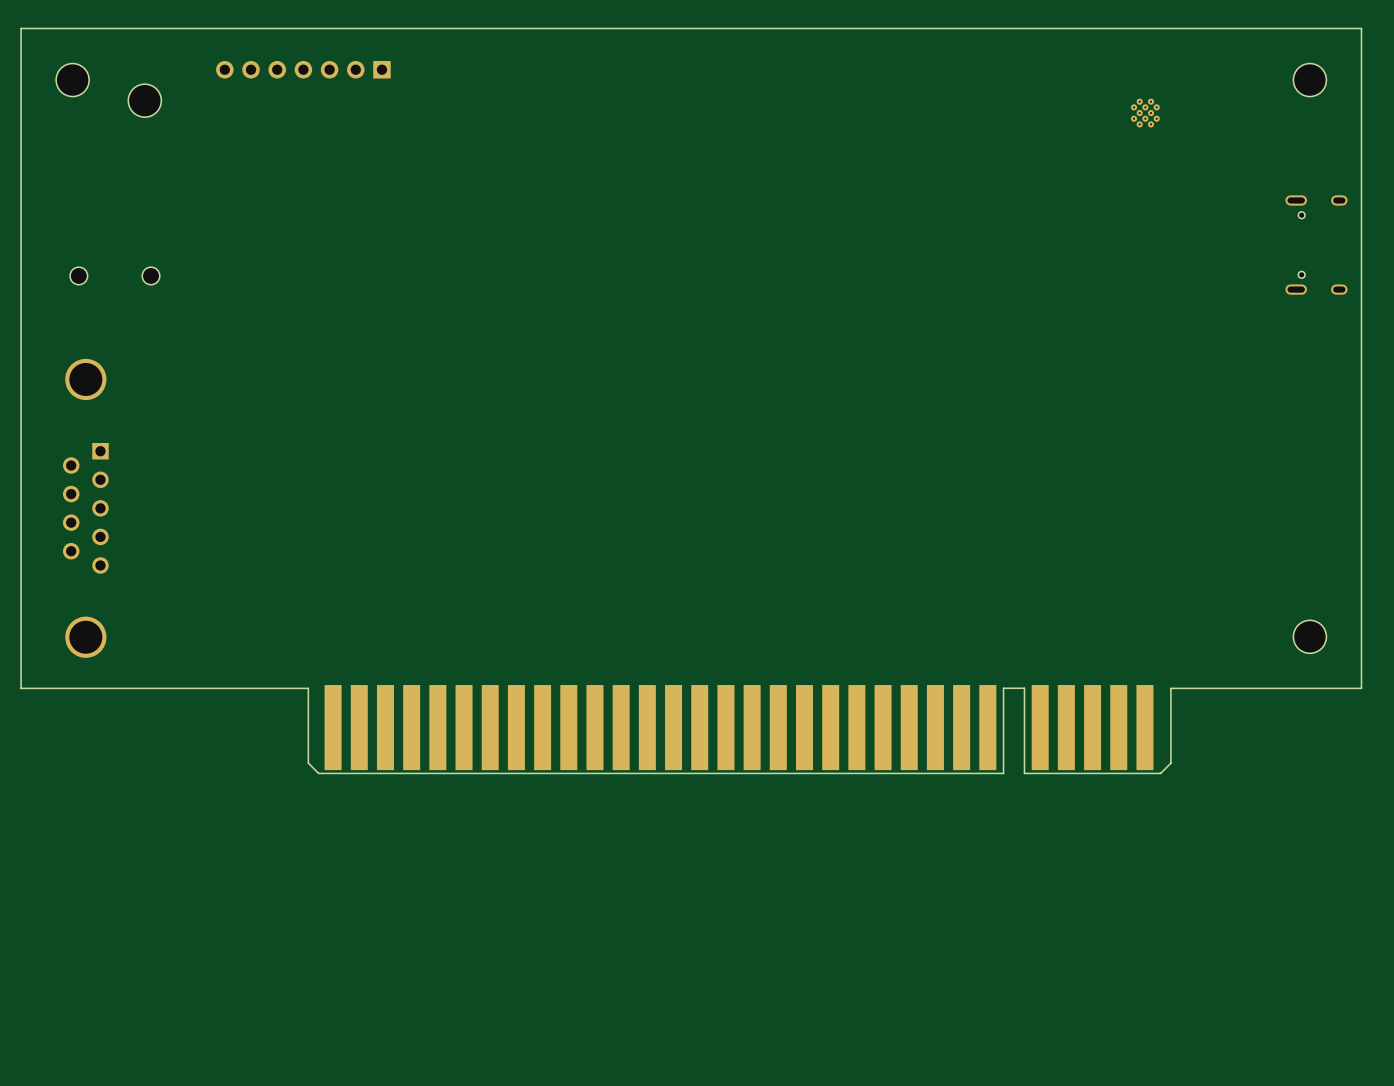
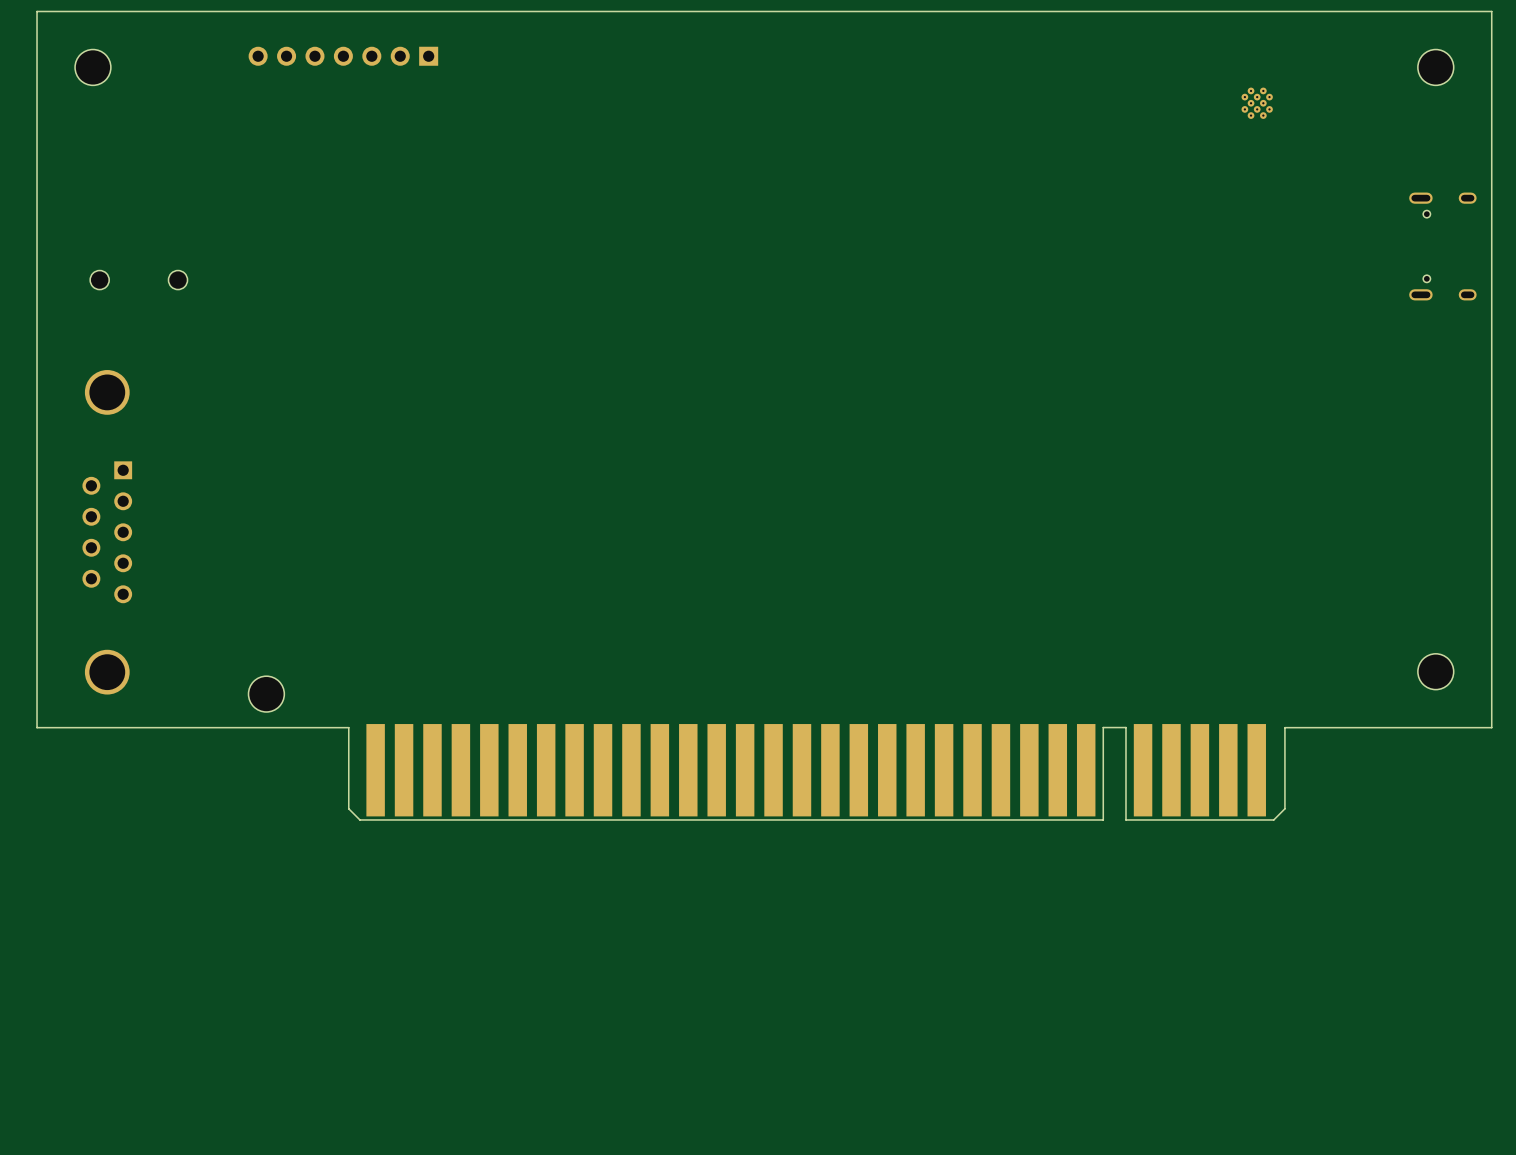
part: (144, 100) -> none
part: none -> (266, 694)

